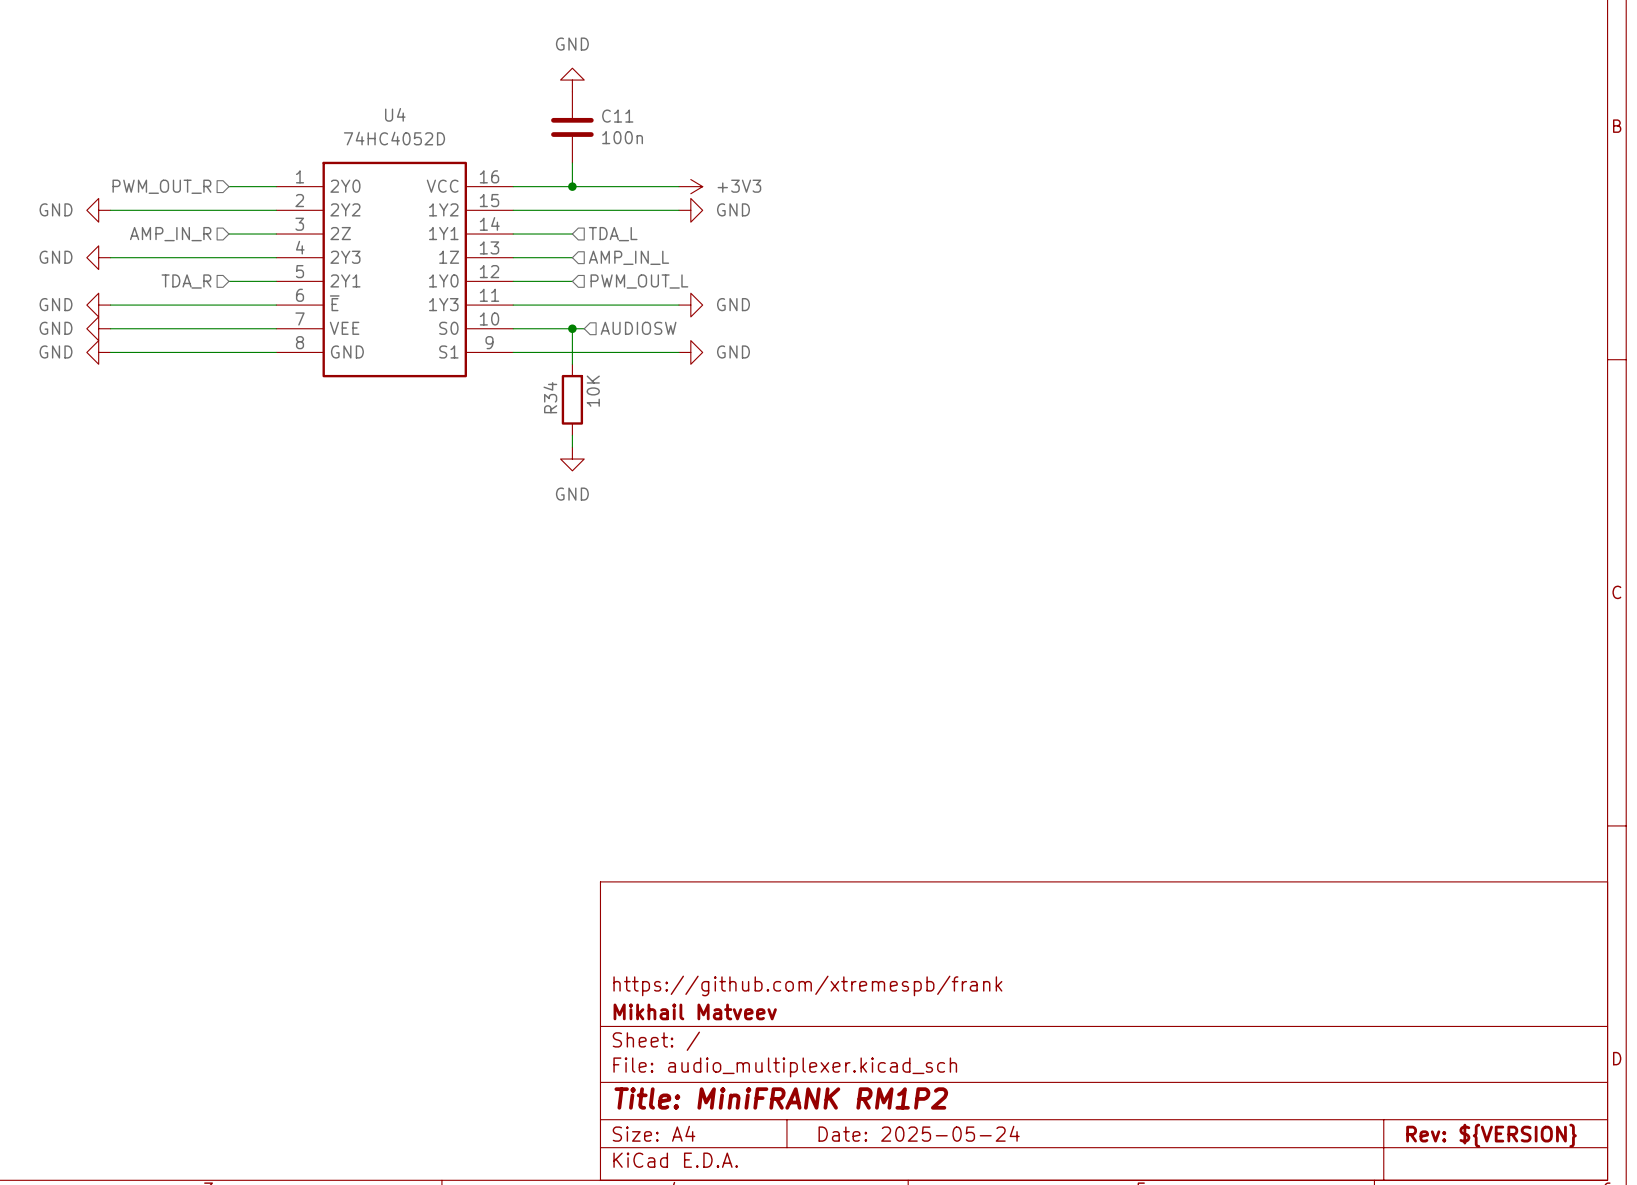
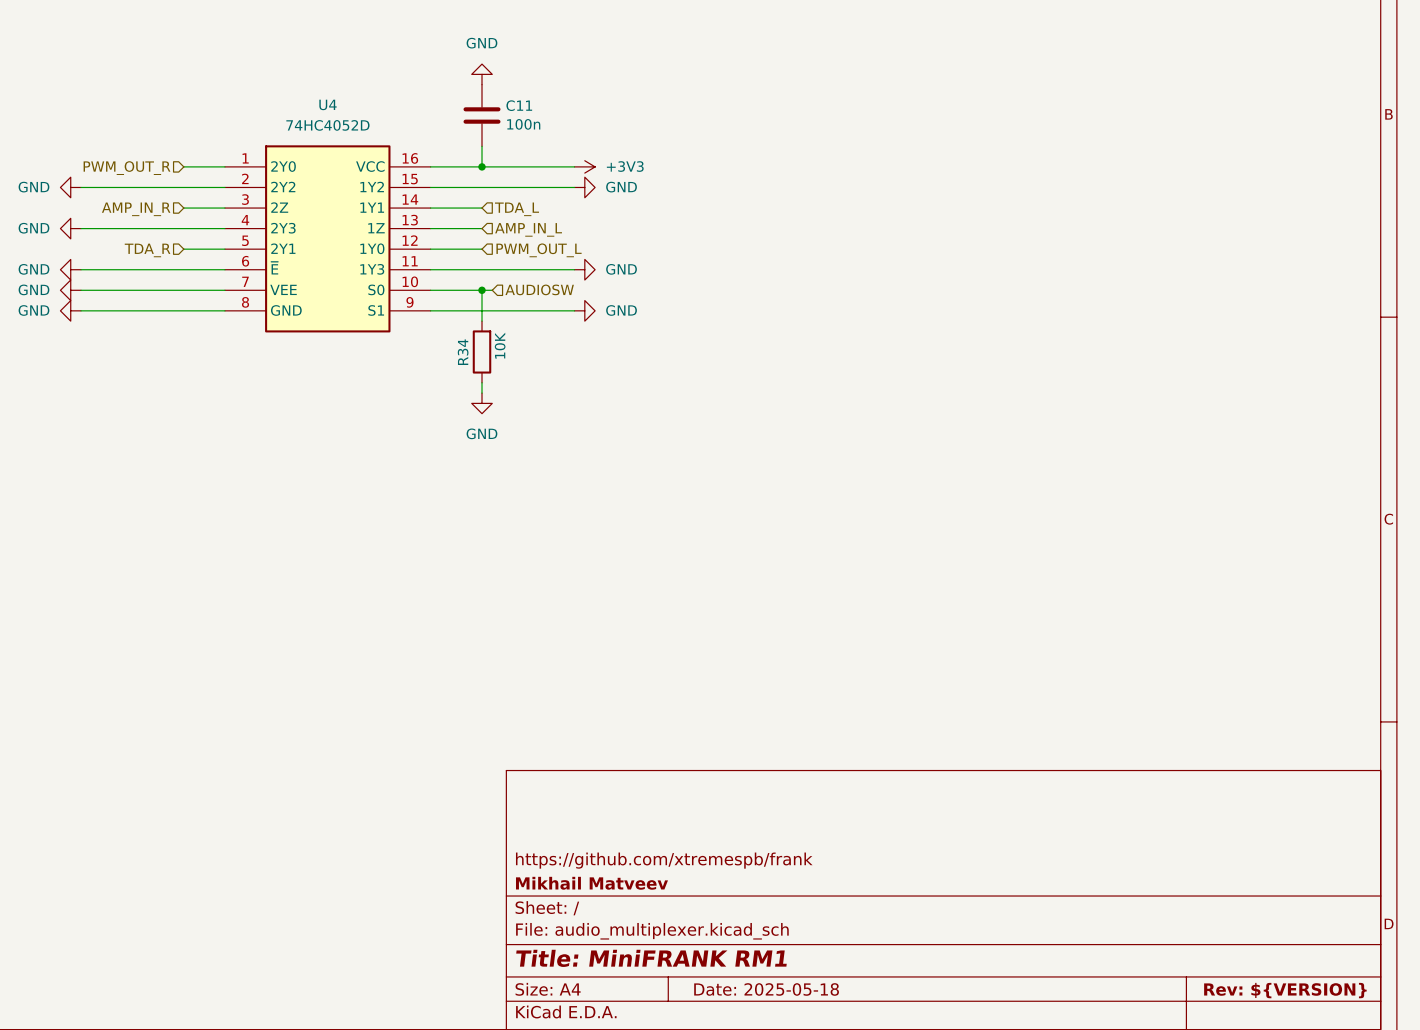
title block: Title: MiniFRANK RM1P2 (781, 1098) -> Title: MiniFRANK RM1 (651, 958)
title block: Date: 2025-05-24 (919, 1133) -> Date: 2025-05-18 (766, 989)

